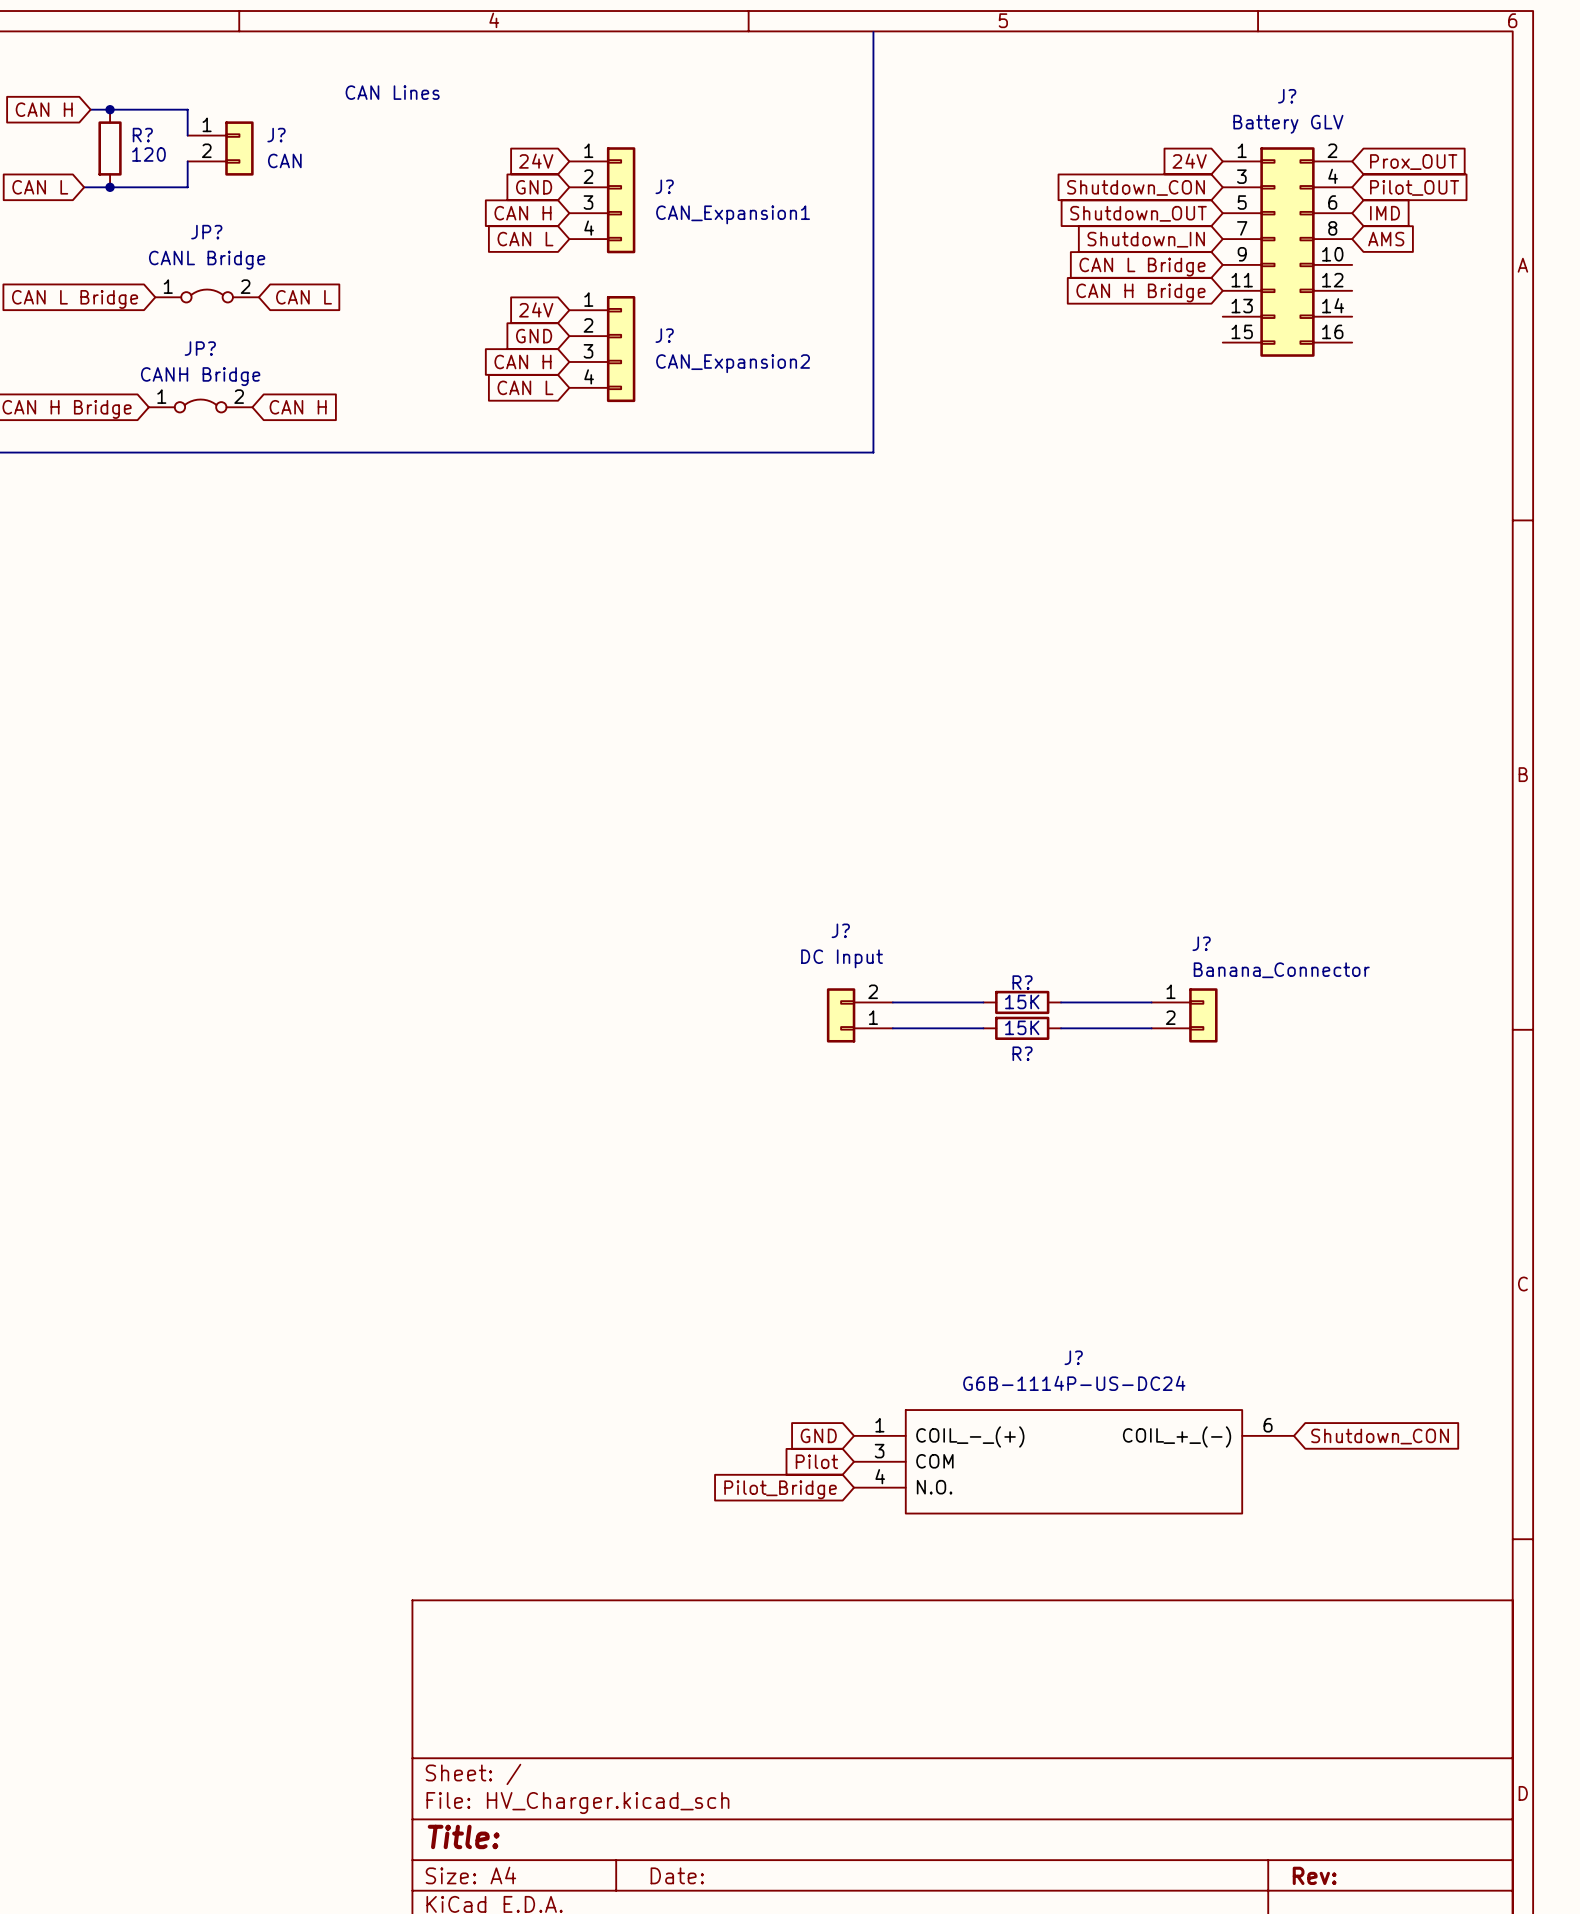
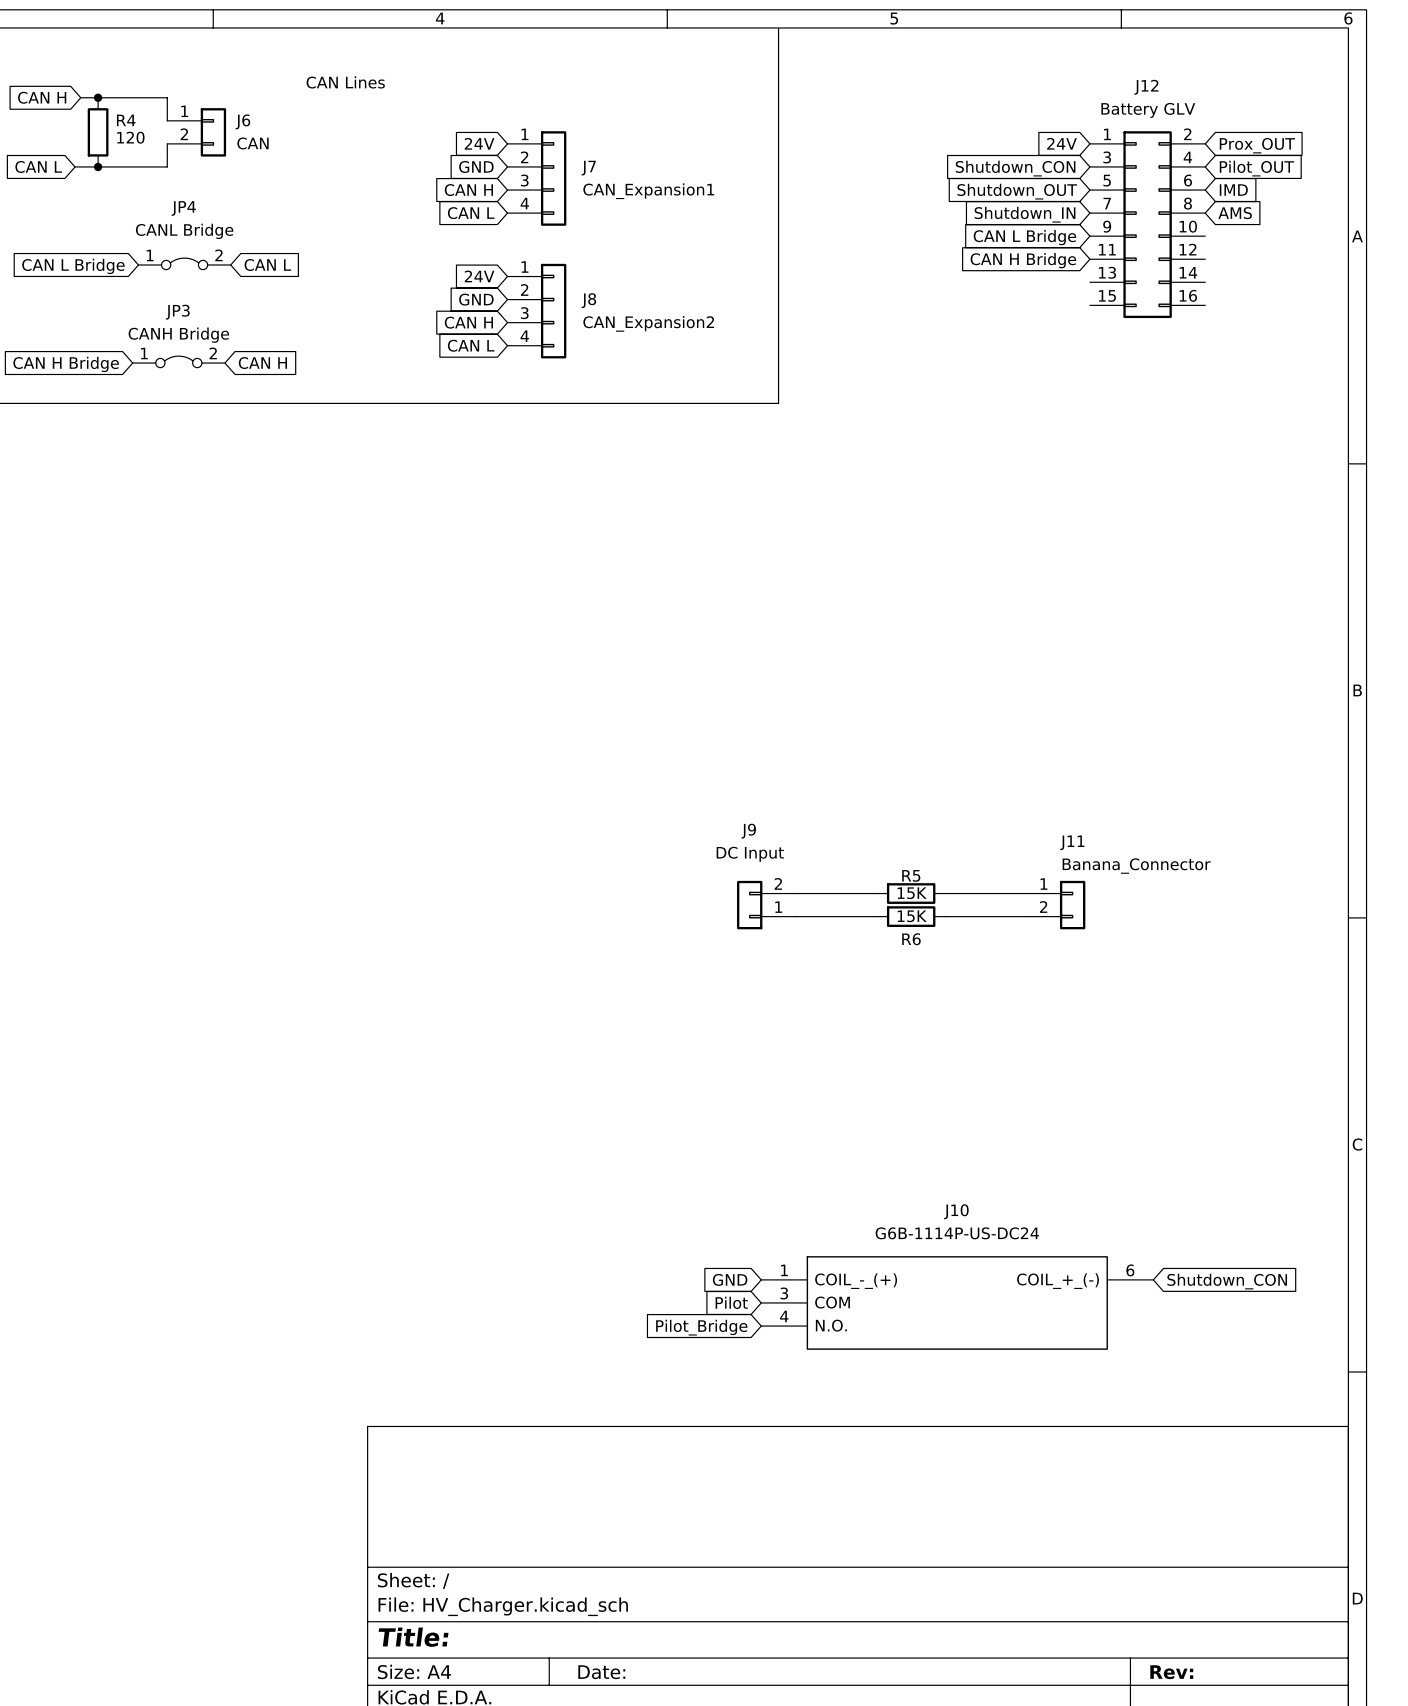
J? name: J? (1287, 96) -> J12 (1146, 87)
R? name: R? (142, 135) -> R4 (126, 120)
J? name: J? (276, 135) -> J6 (242, 121)
J? name: J? (664, 186) -> J7 (588, 168)
JP? name: JP? (206, 232) -> JP4 (183, 208)
J? name: J? (664, 335) -> J8 (588, 300)
JP? name: JP? (200, 348) -> JP3 (177, 312)
J? name: J? (840, 930) -> J9 (748, 831)
J? name: J? (1201, 943) -> J11 (1072, 842)
R? name: R? (1022, 982) -> R5 (911, 875)
R? name: R? (1022, 1053) -> R6 (911, 939)
J? name: J? (1073, 1357) -> J10 (956, 1211)

